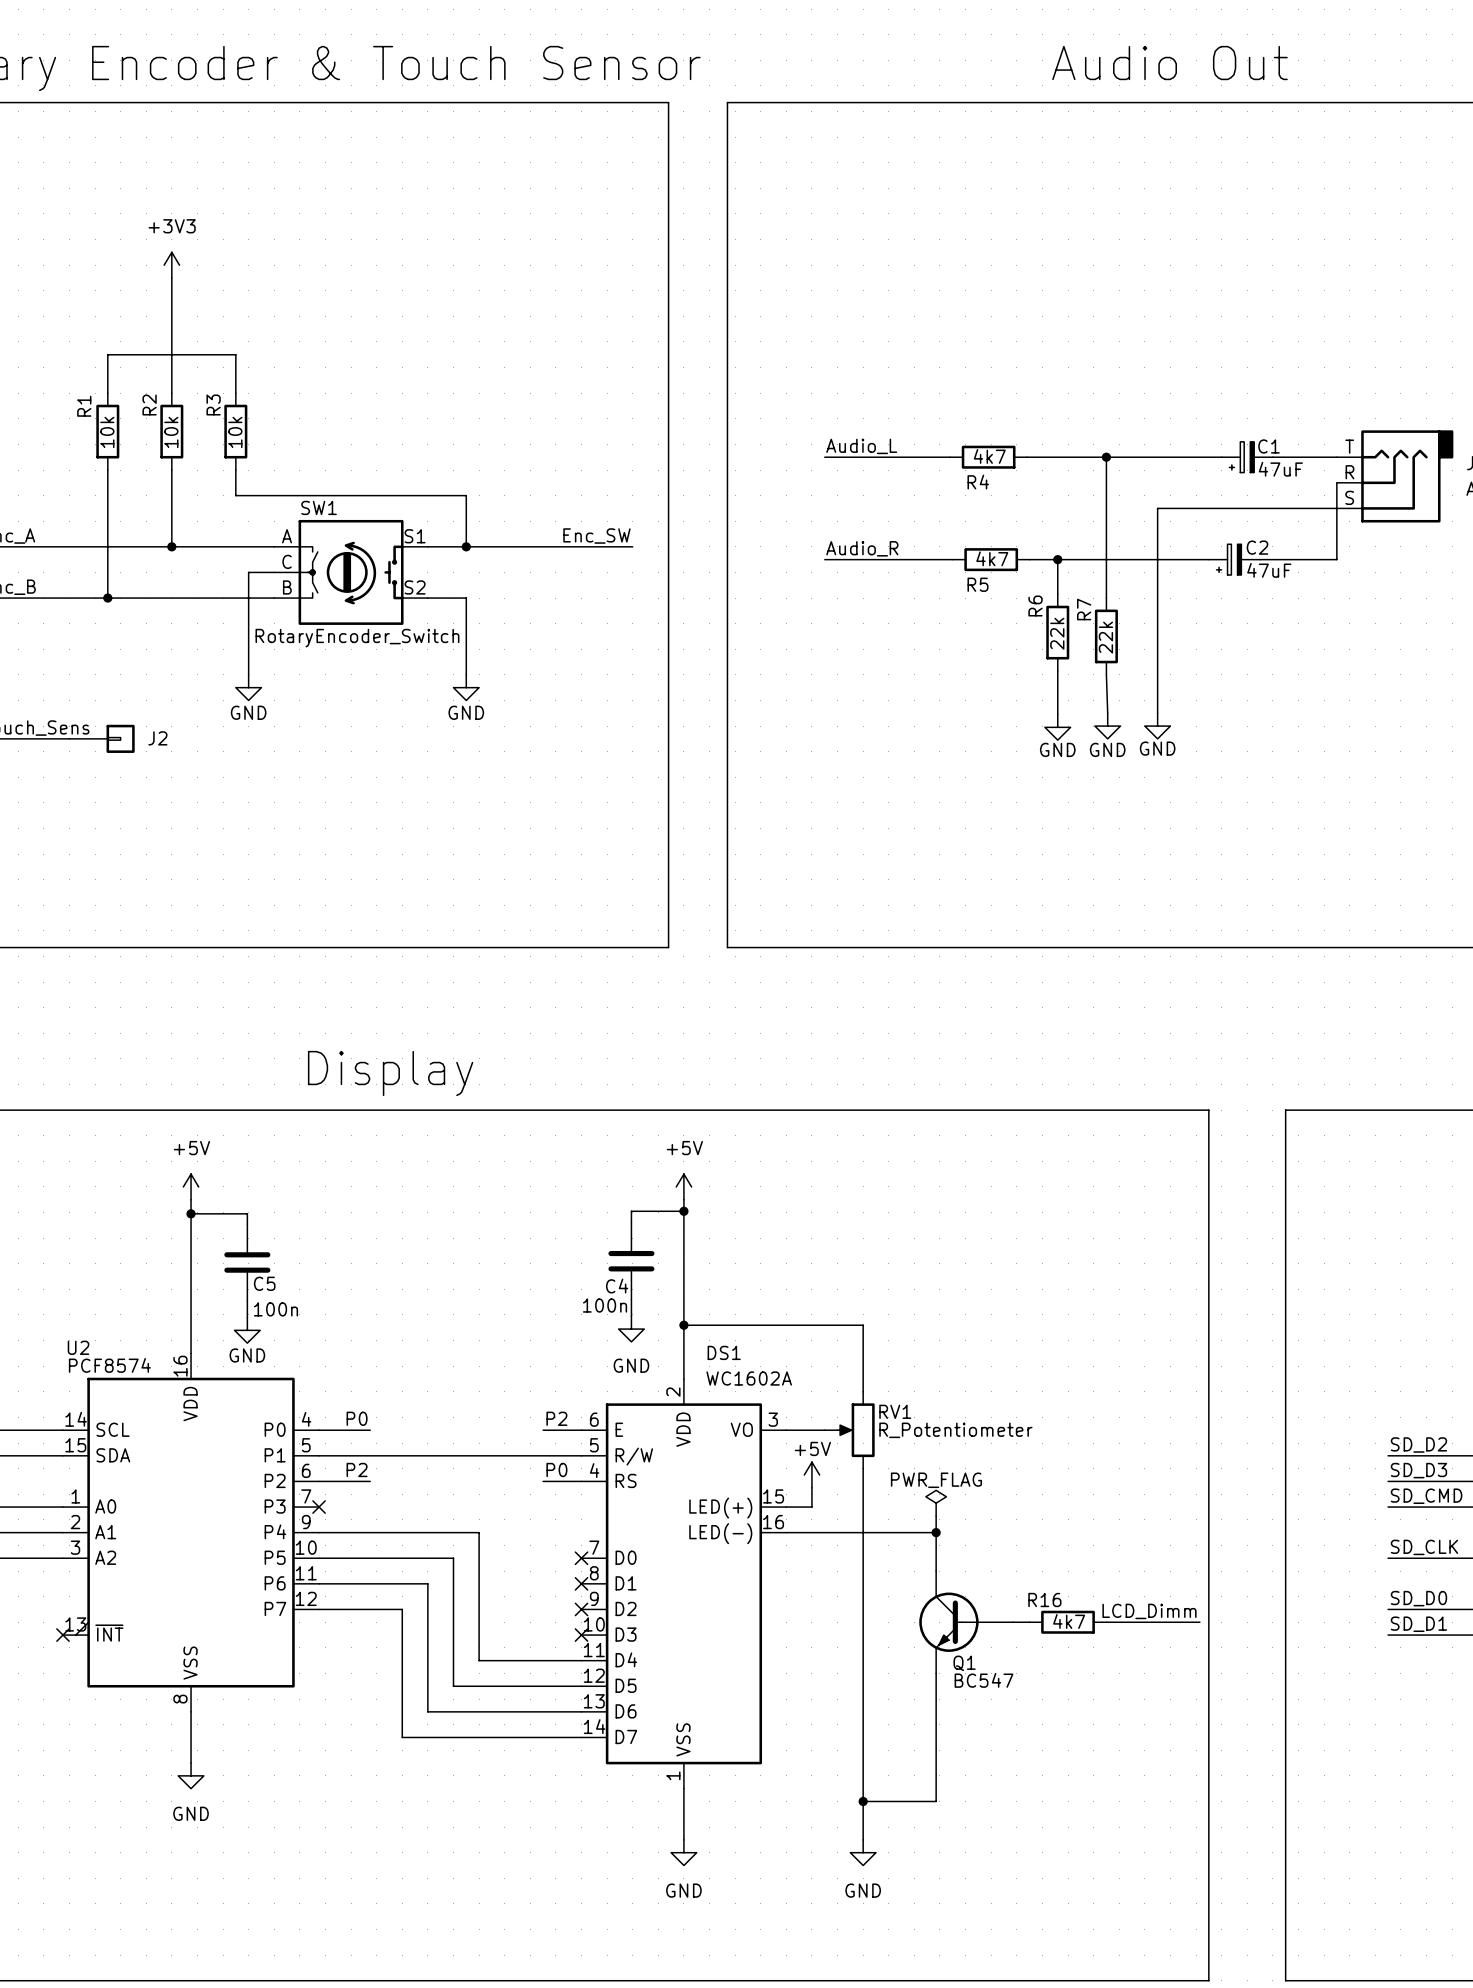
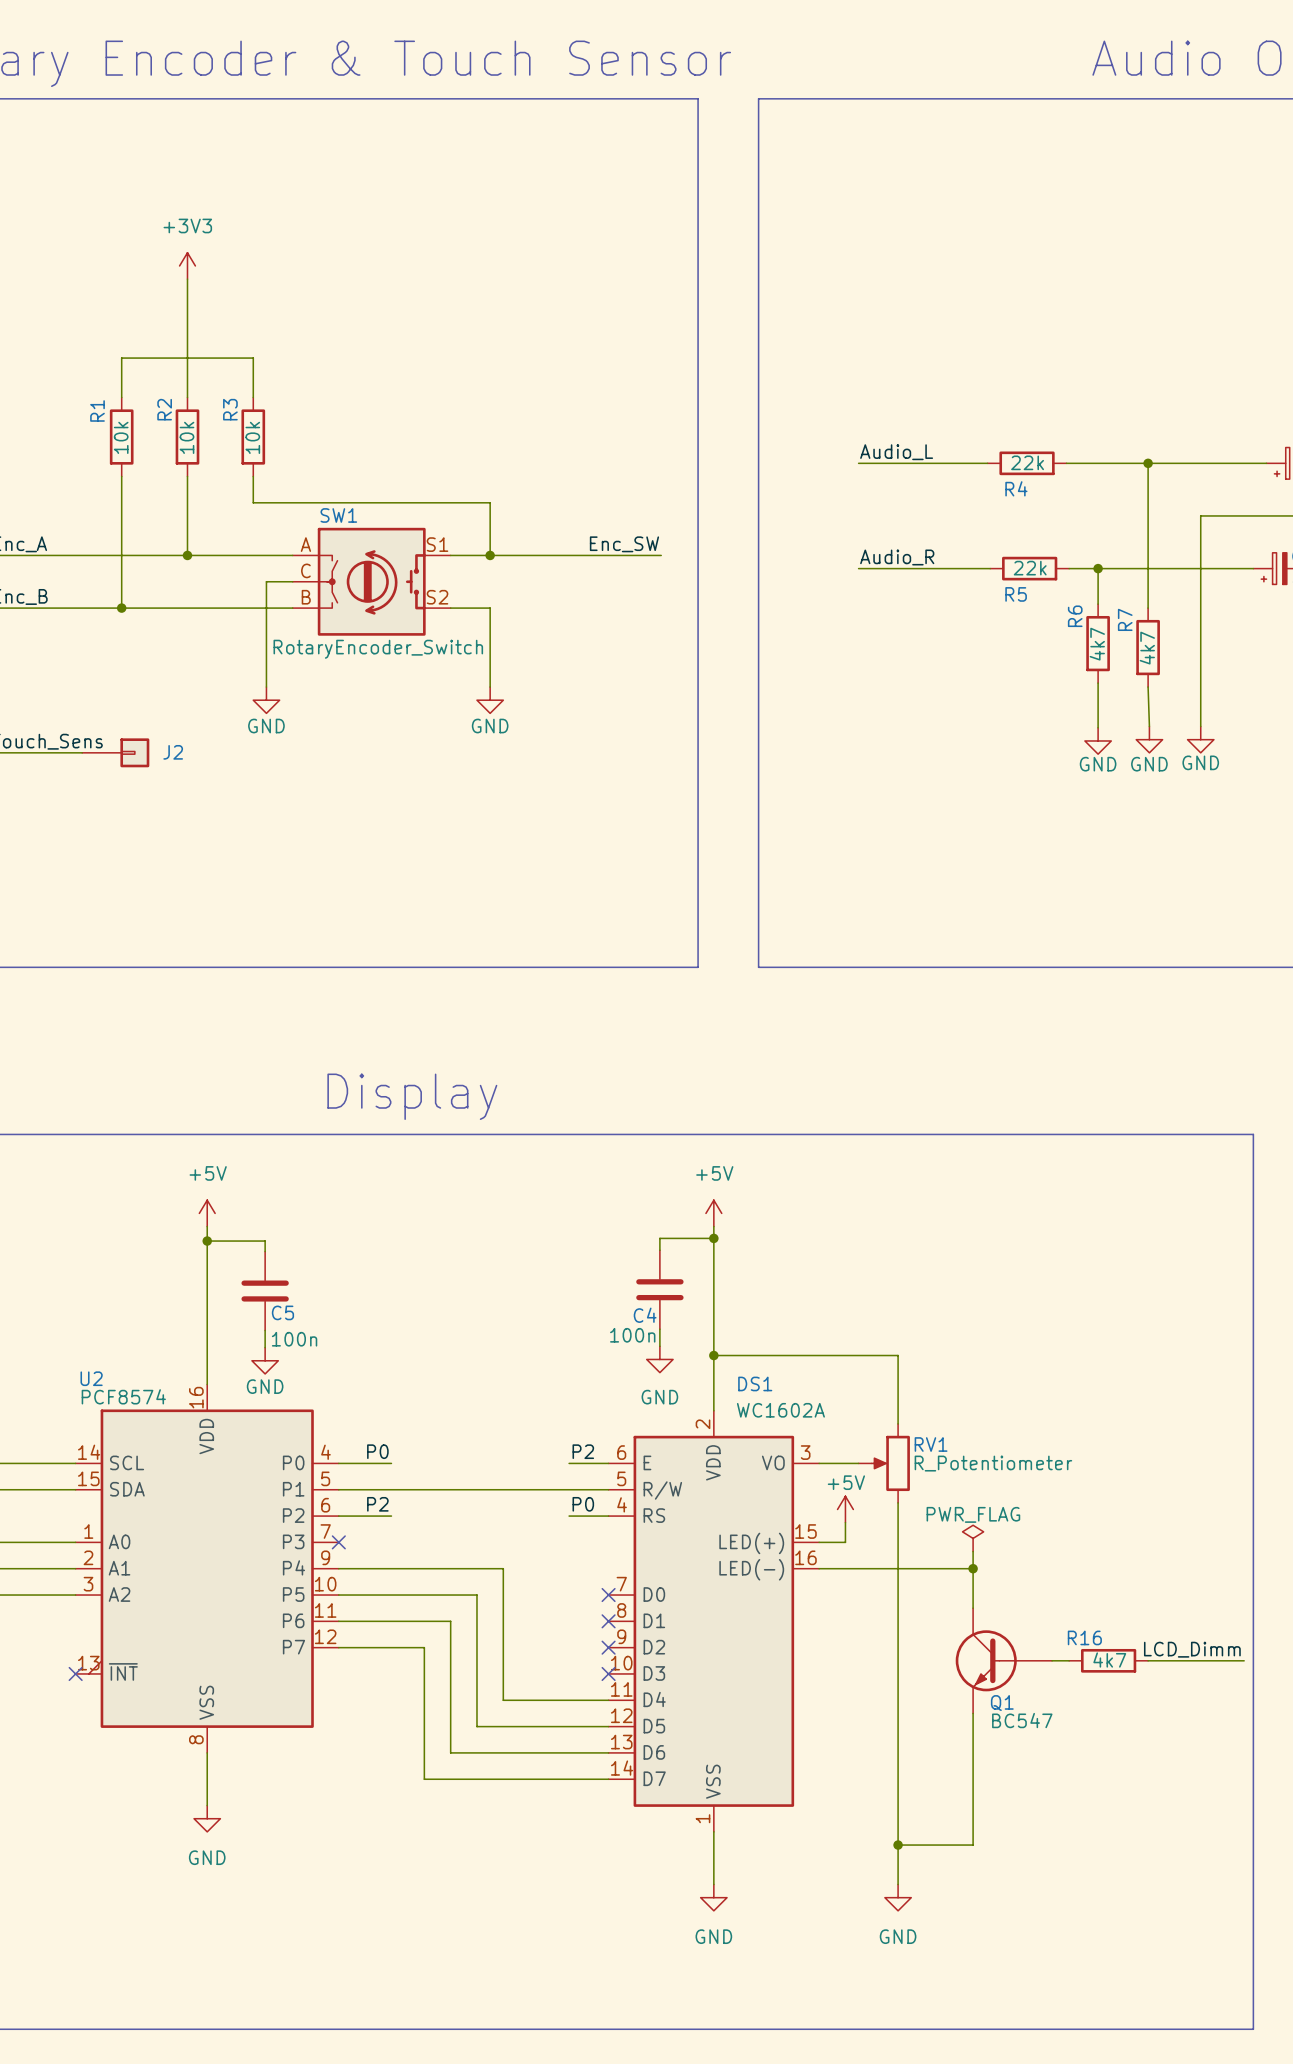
R4 value: 4k7 (989, 456) -> 22k (1027, 462)
R5 value: 4k7 (992, 558) -> 22k (1030, 568)
R6 value: 22k (1057, 633) -> 4k7 (1097, 644)
R7 value: 22k (1105, 637) -> 4k7 (1147, 648)

